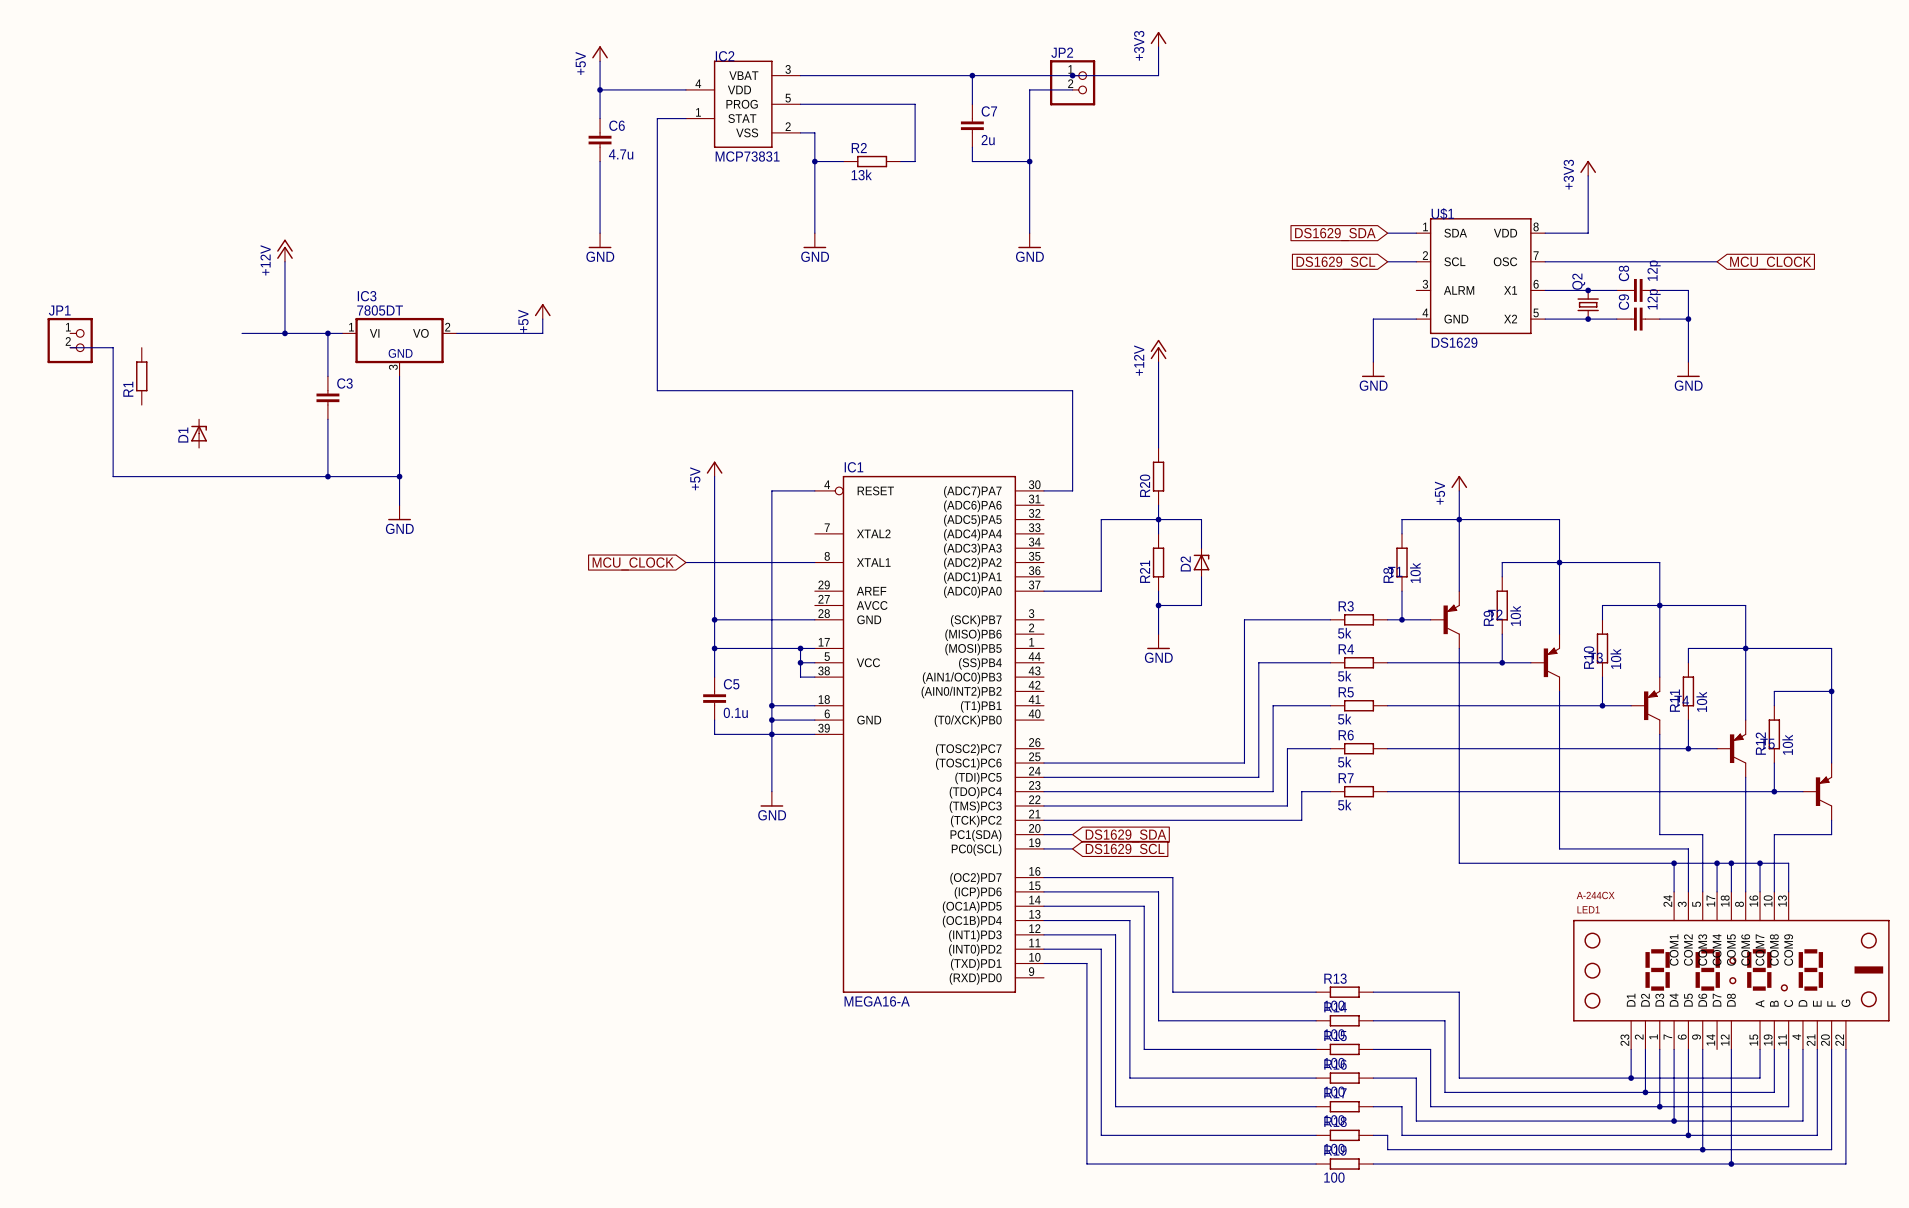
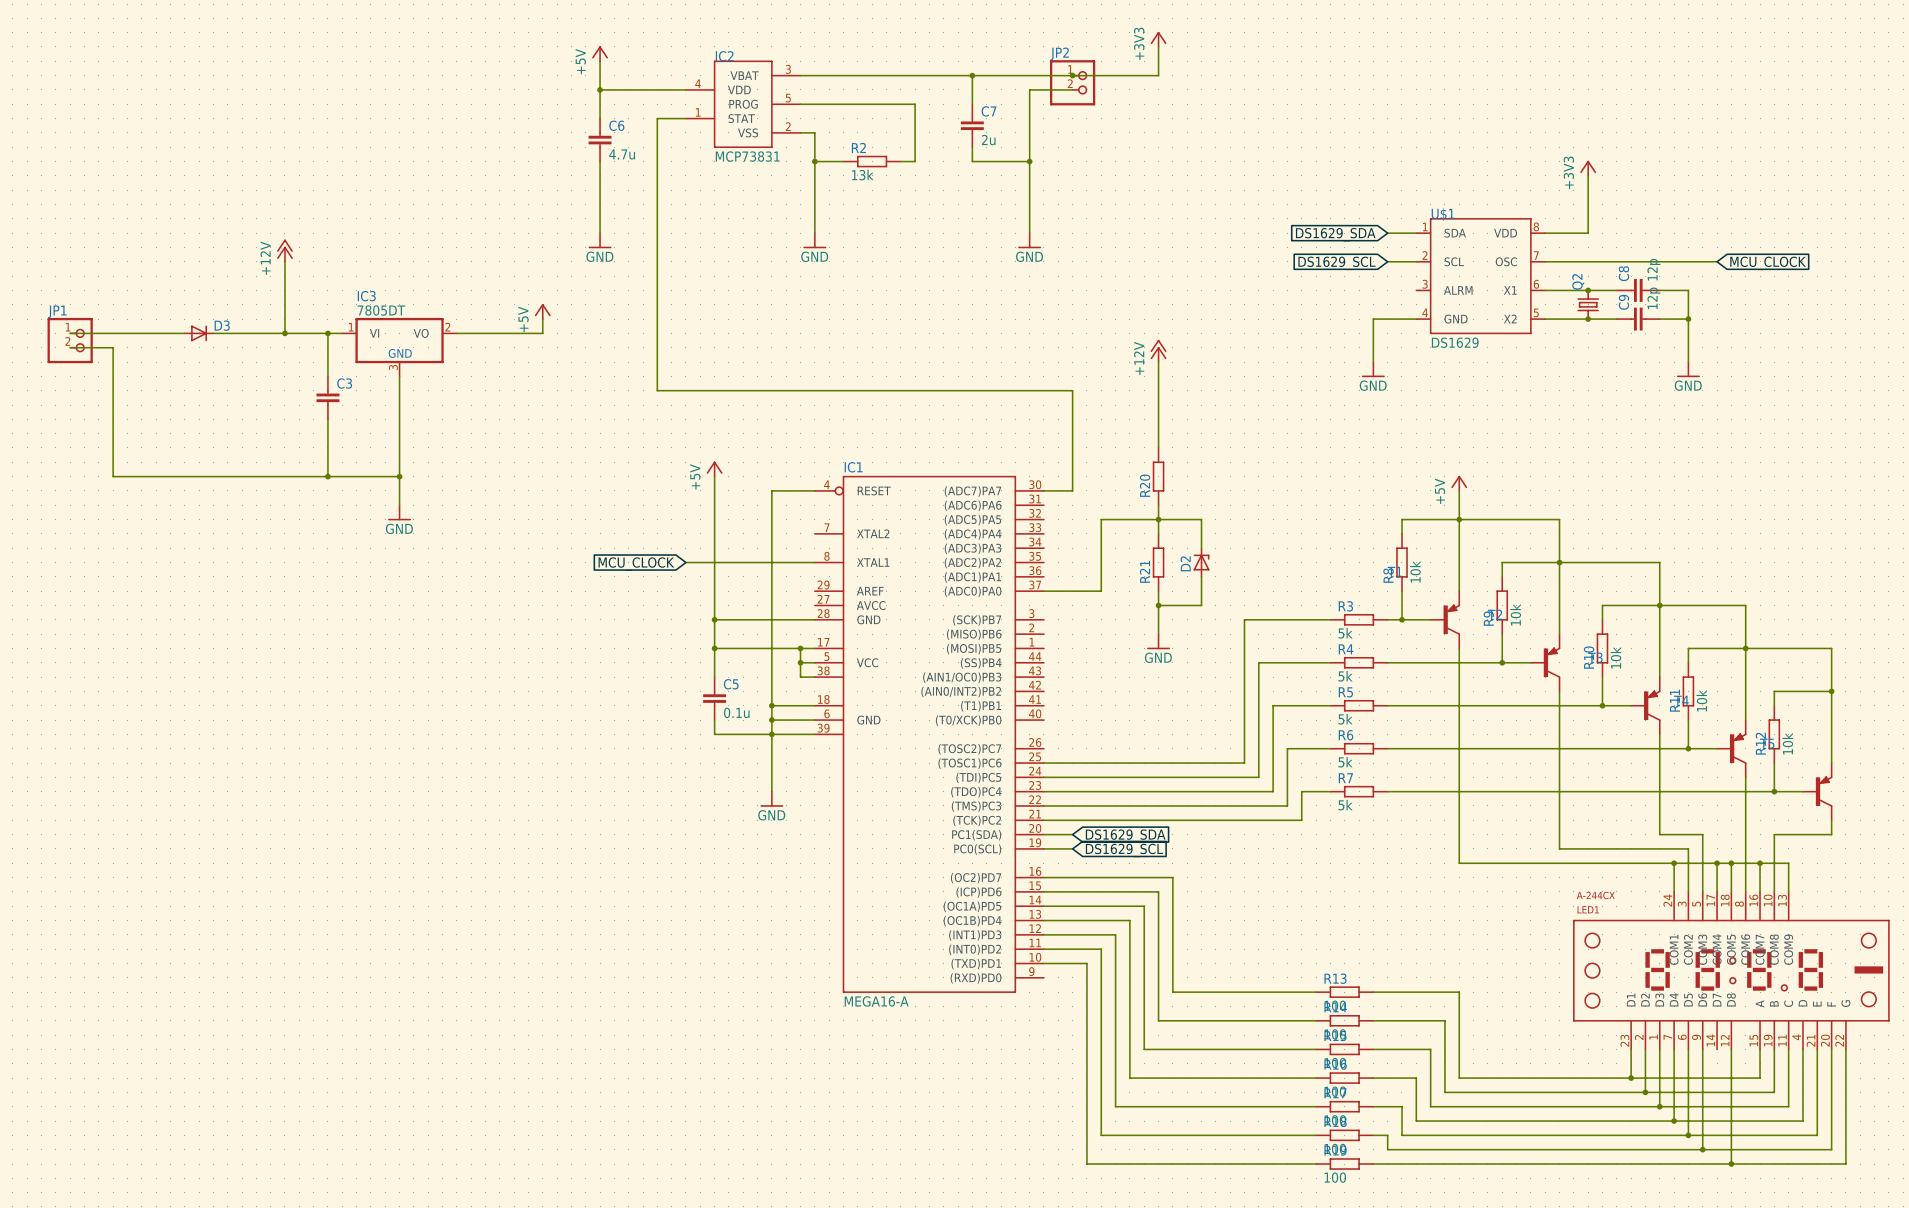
wire: none -> (70, 333) (184, 333)
D3: none -> (199, 333)
wire: none -> (213, 333) (242, 333)
R1: (141, 376) -> none
D1: (199, 433) -> none

